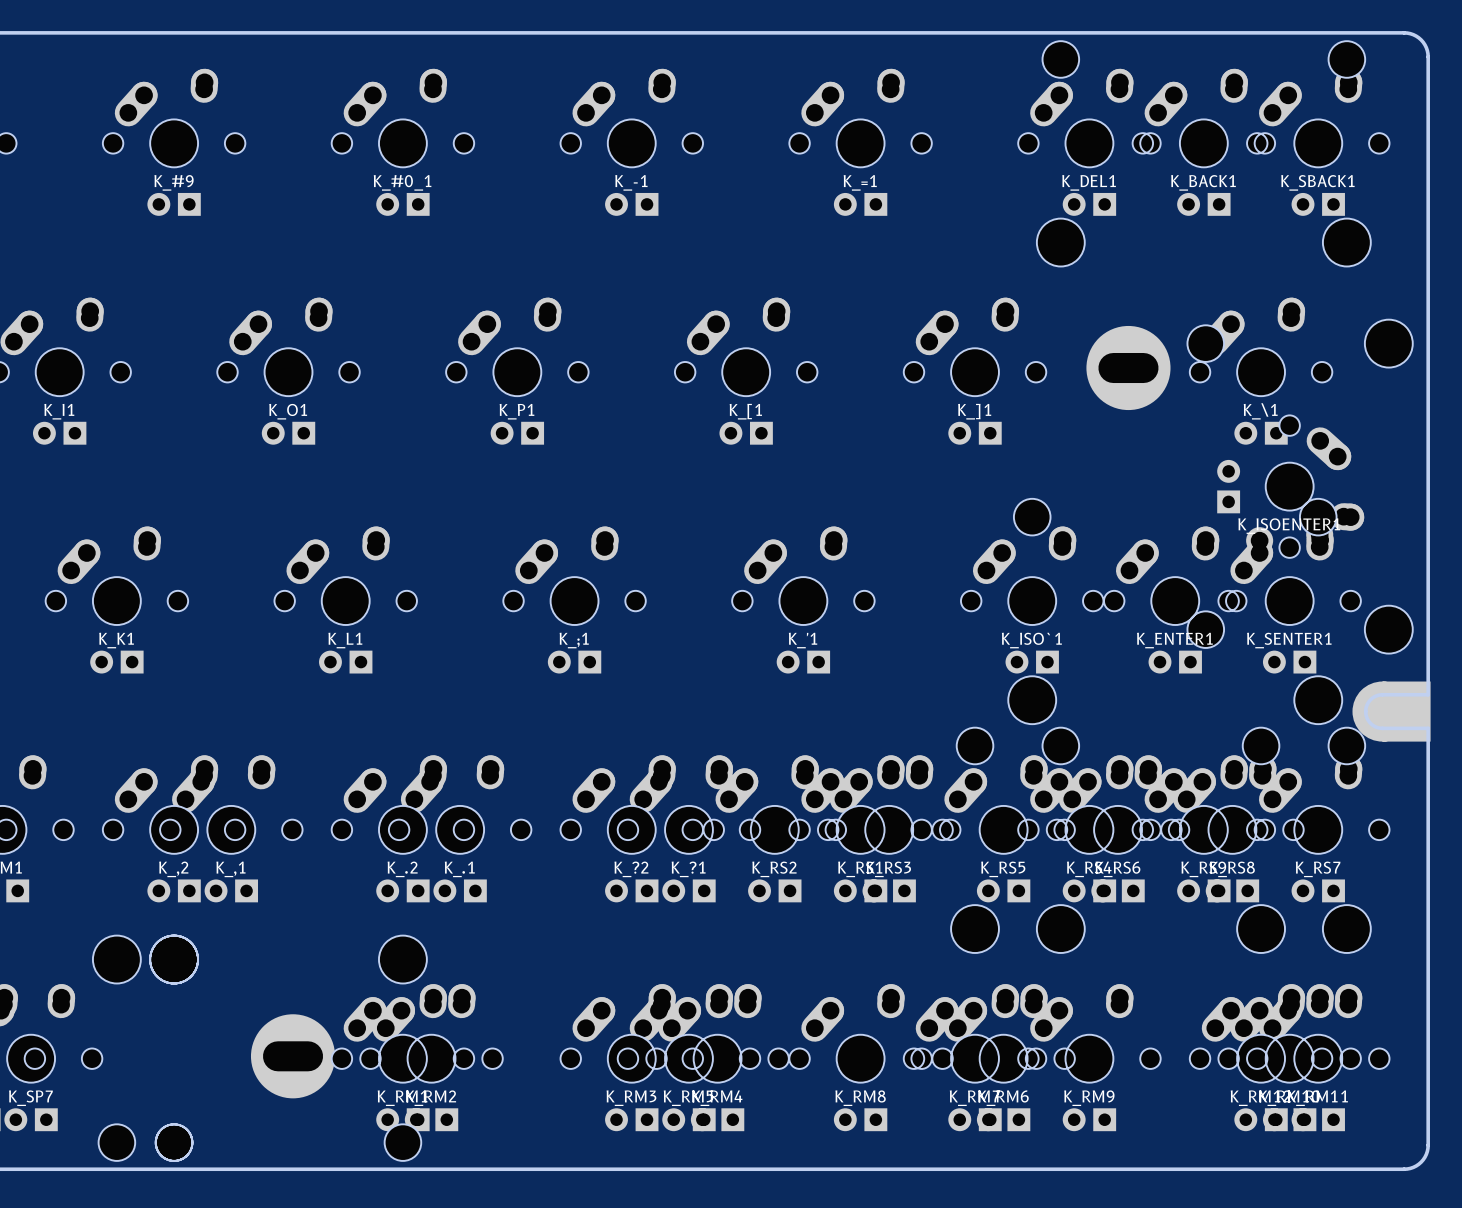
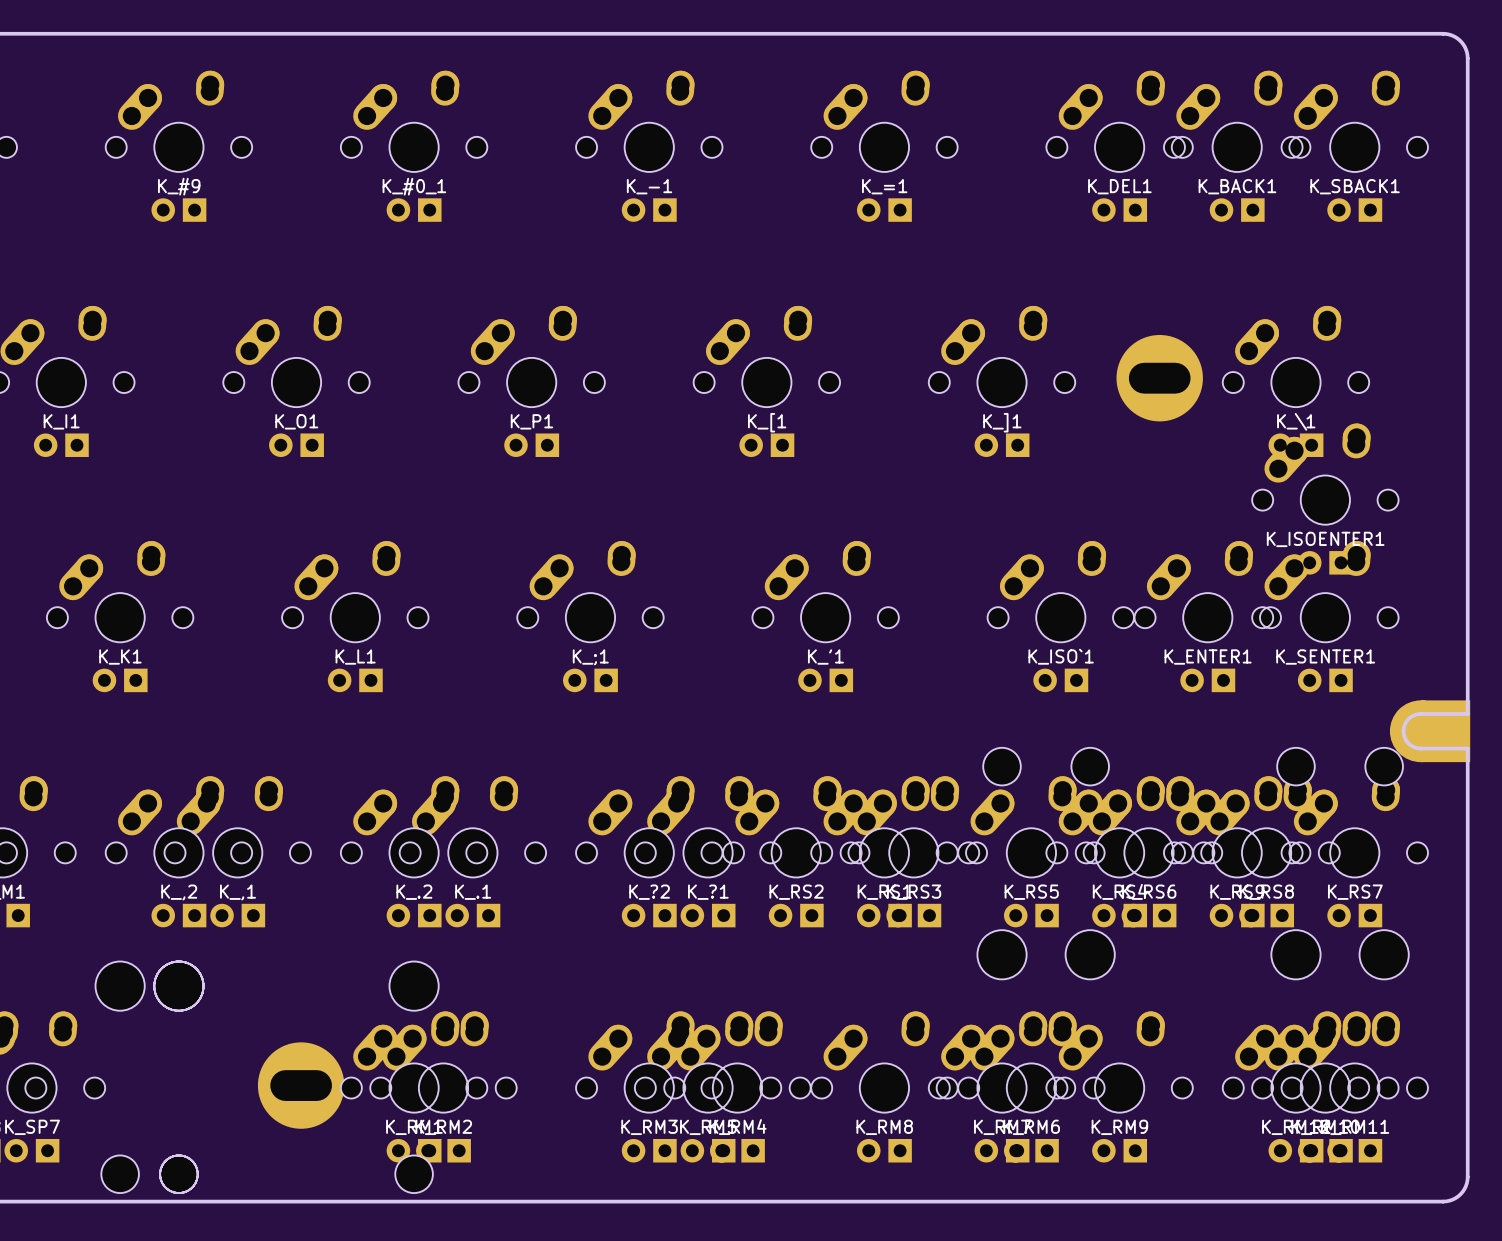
K_BACK1 footprint: [1036, 41, 1371, 267] -> [1163, 70, 1311, 222]
K_ISOENTER1 footprint: [1187, 319, 1413, 654] -> [1252, 423, 1399, 575]
K_ENTER1 footprint: [1008, 498, 1343, 725] -> [1134, 541, 1282, 693]

